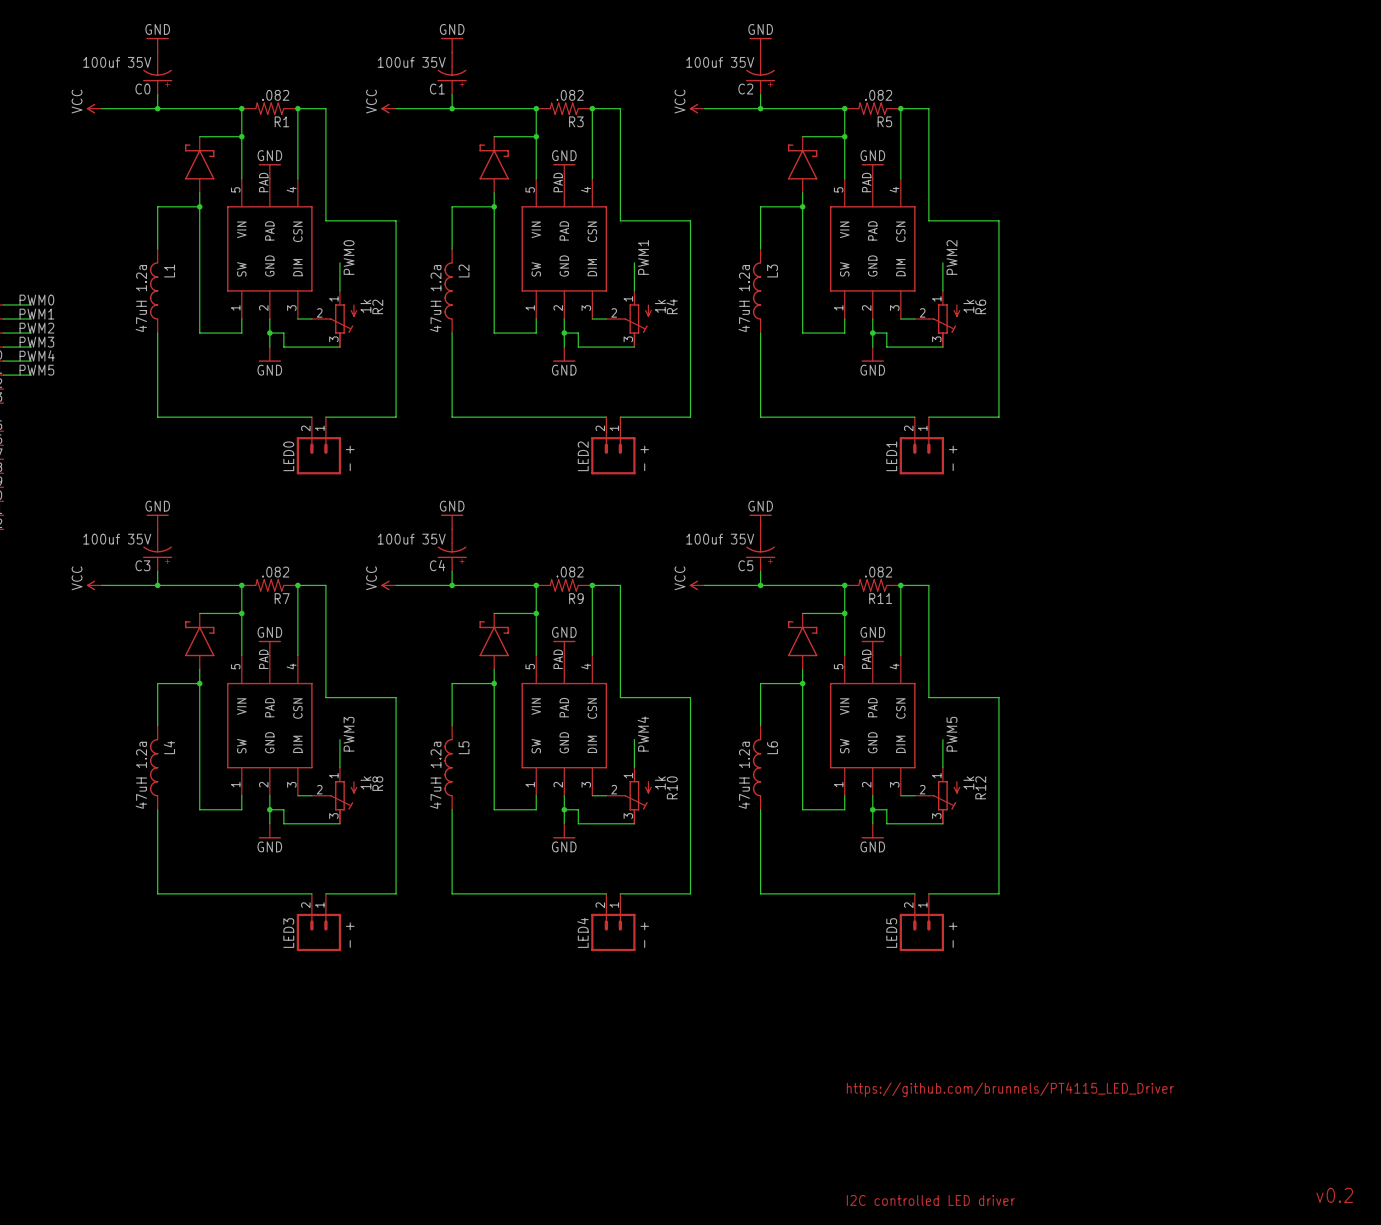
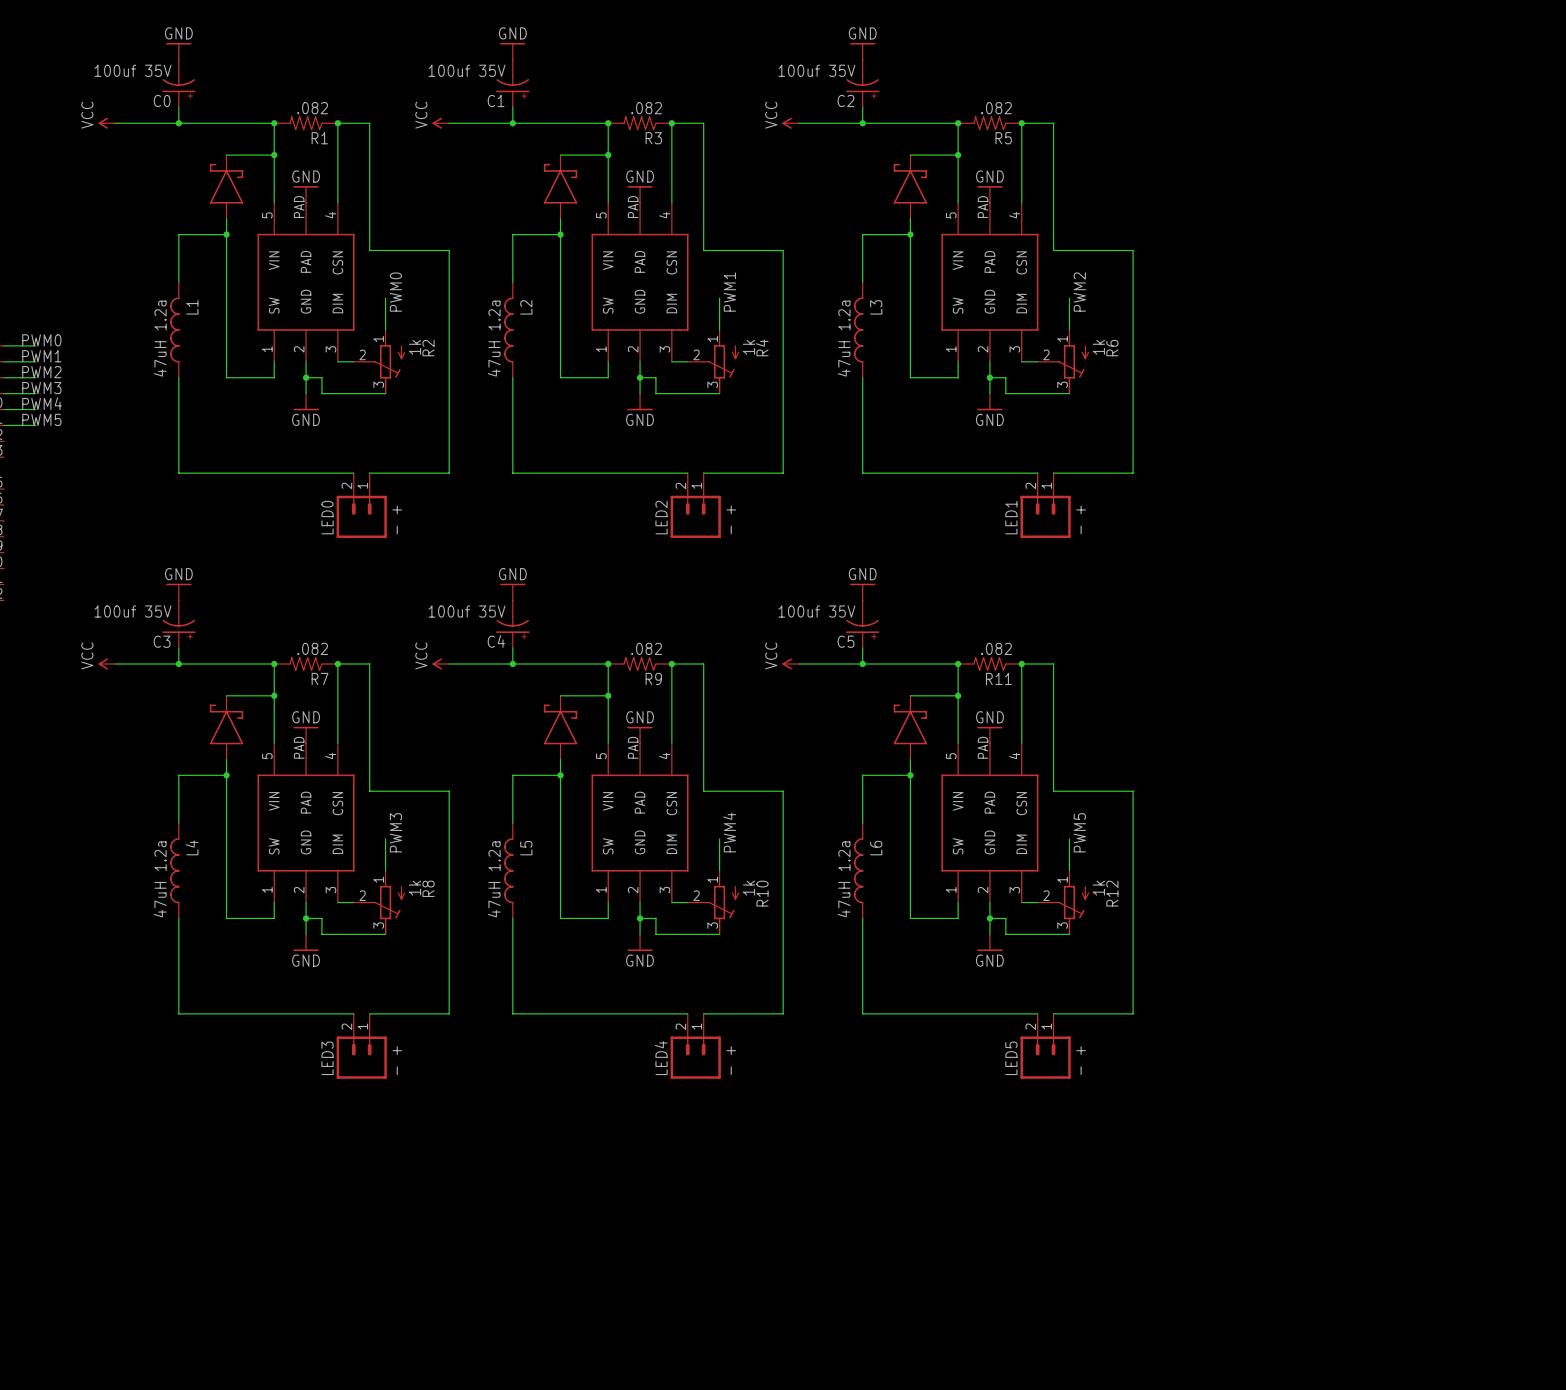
text: https://github.com/brunnels/PT4115_LED_Driver (1010, 1089) -> none
text: v0.2 (1334, 1195) -> none
text: I2C controlled LED driver (930, 1200) -> none

